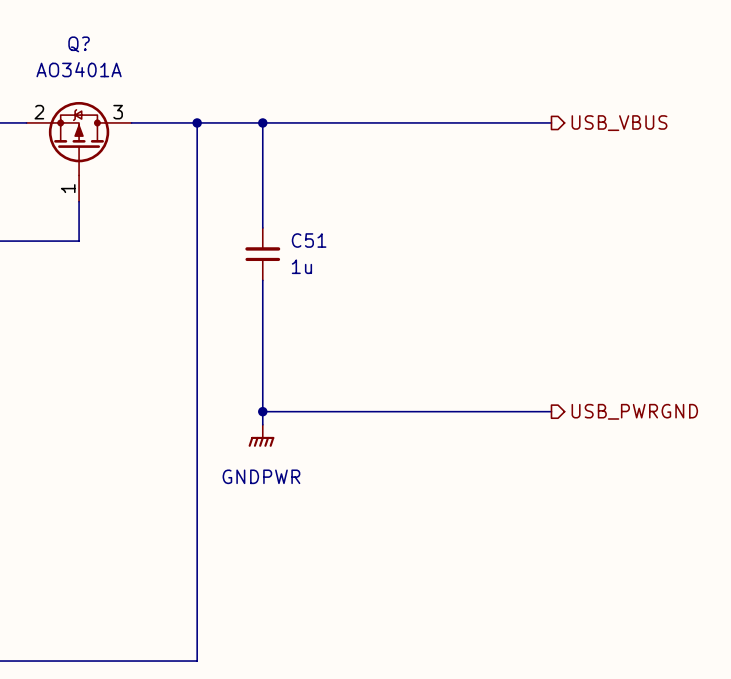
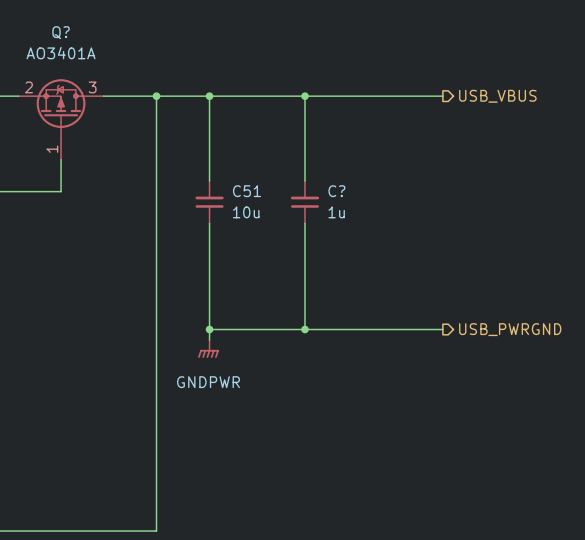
wire: none -> (305, 96) (305, 181)
junction: none -> (305, 96)
C?: none -> 1u (305, 202)
C51 value: 1u (301, 266) -> 10u (246, 212)
wire: none -> (305, 223) (305, 329)
junction: none -> (305, 329)

